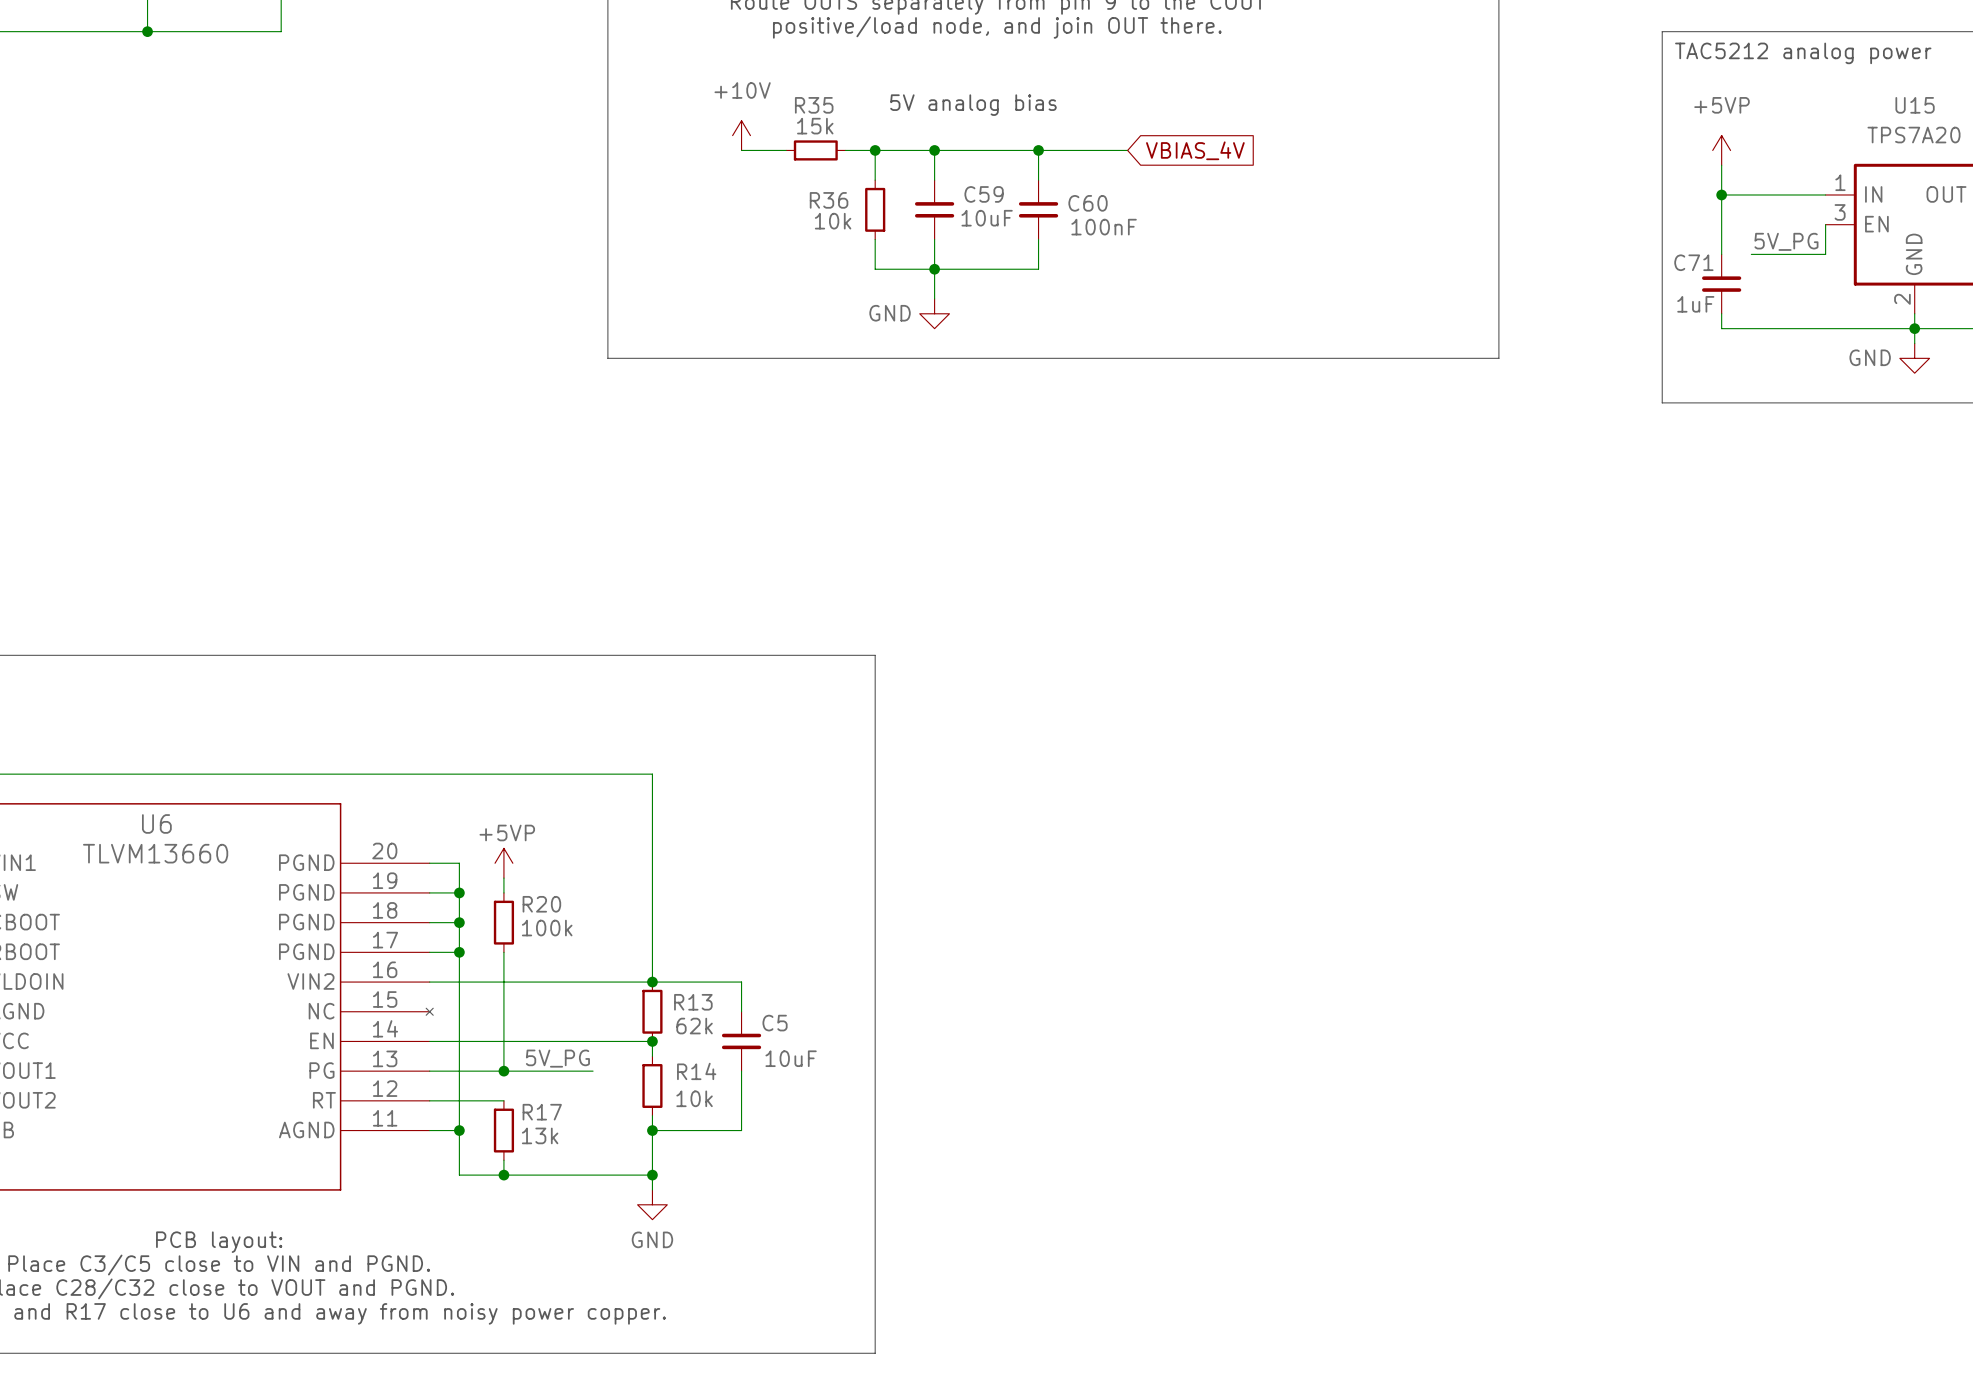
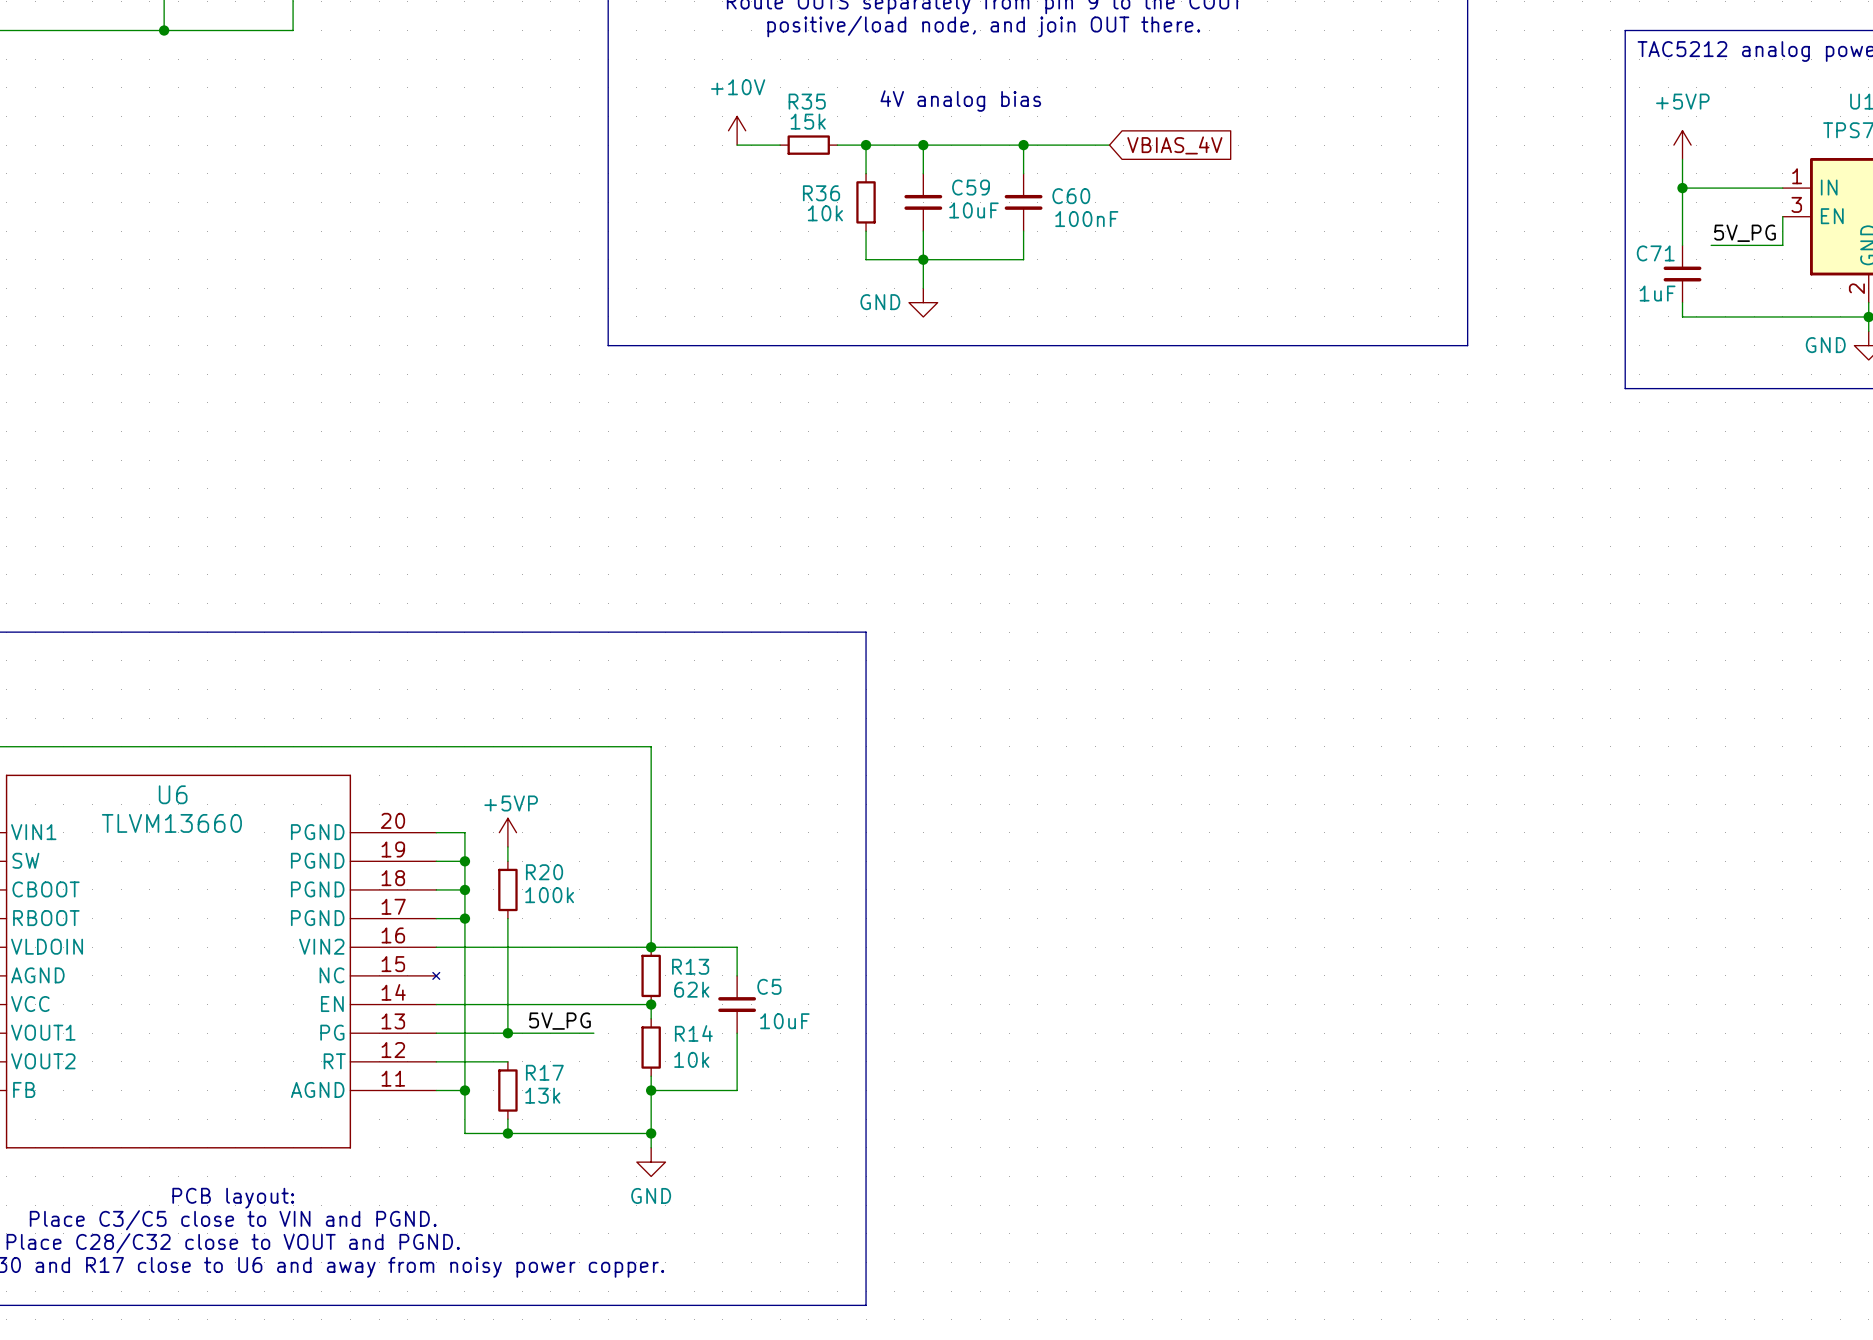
text: 5V analog bias (973, 105) -> 4V analog bias (960, 101)

